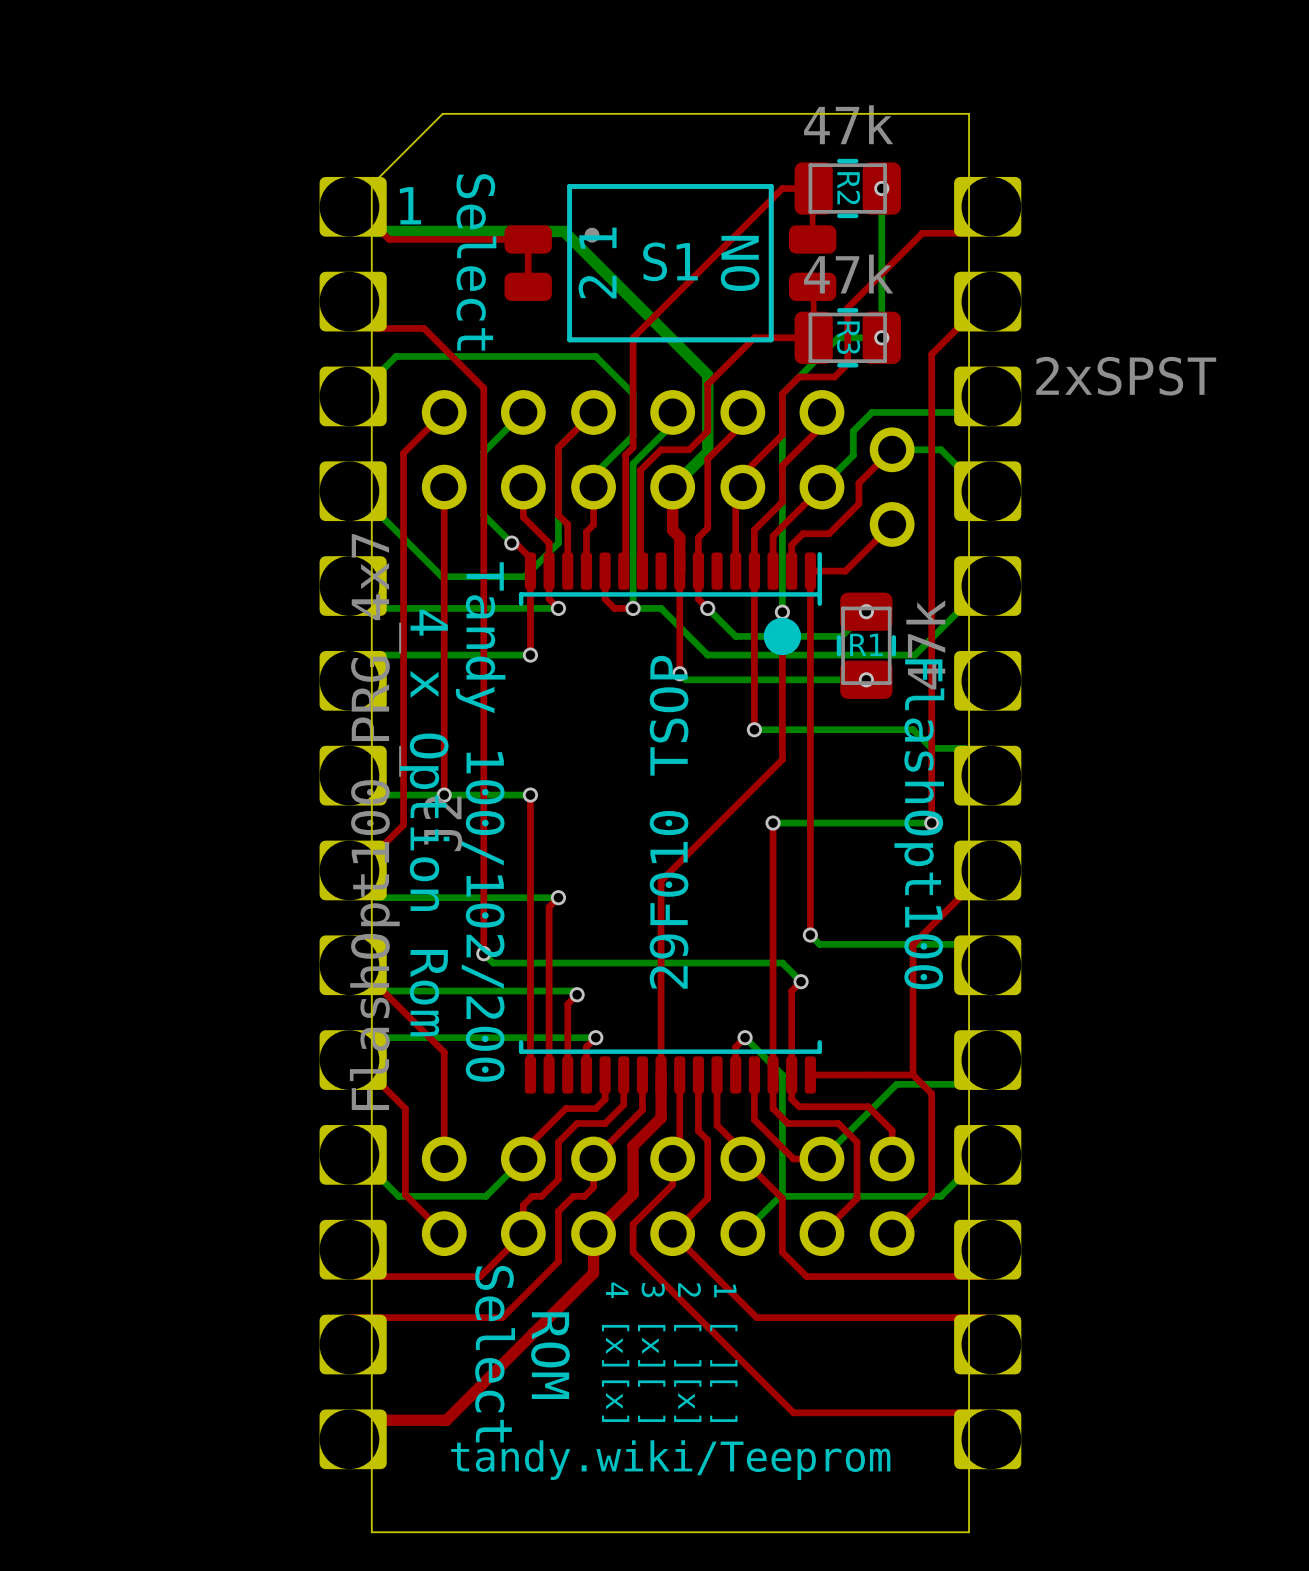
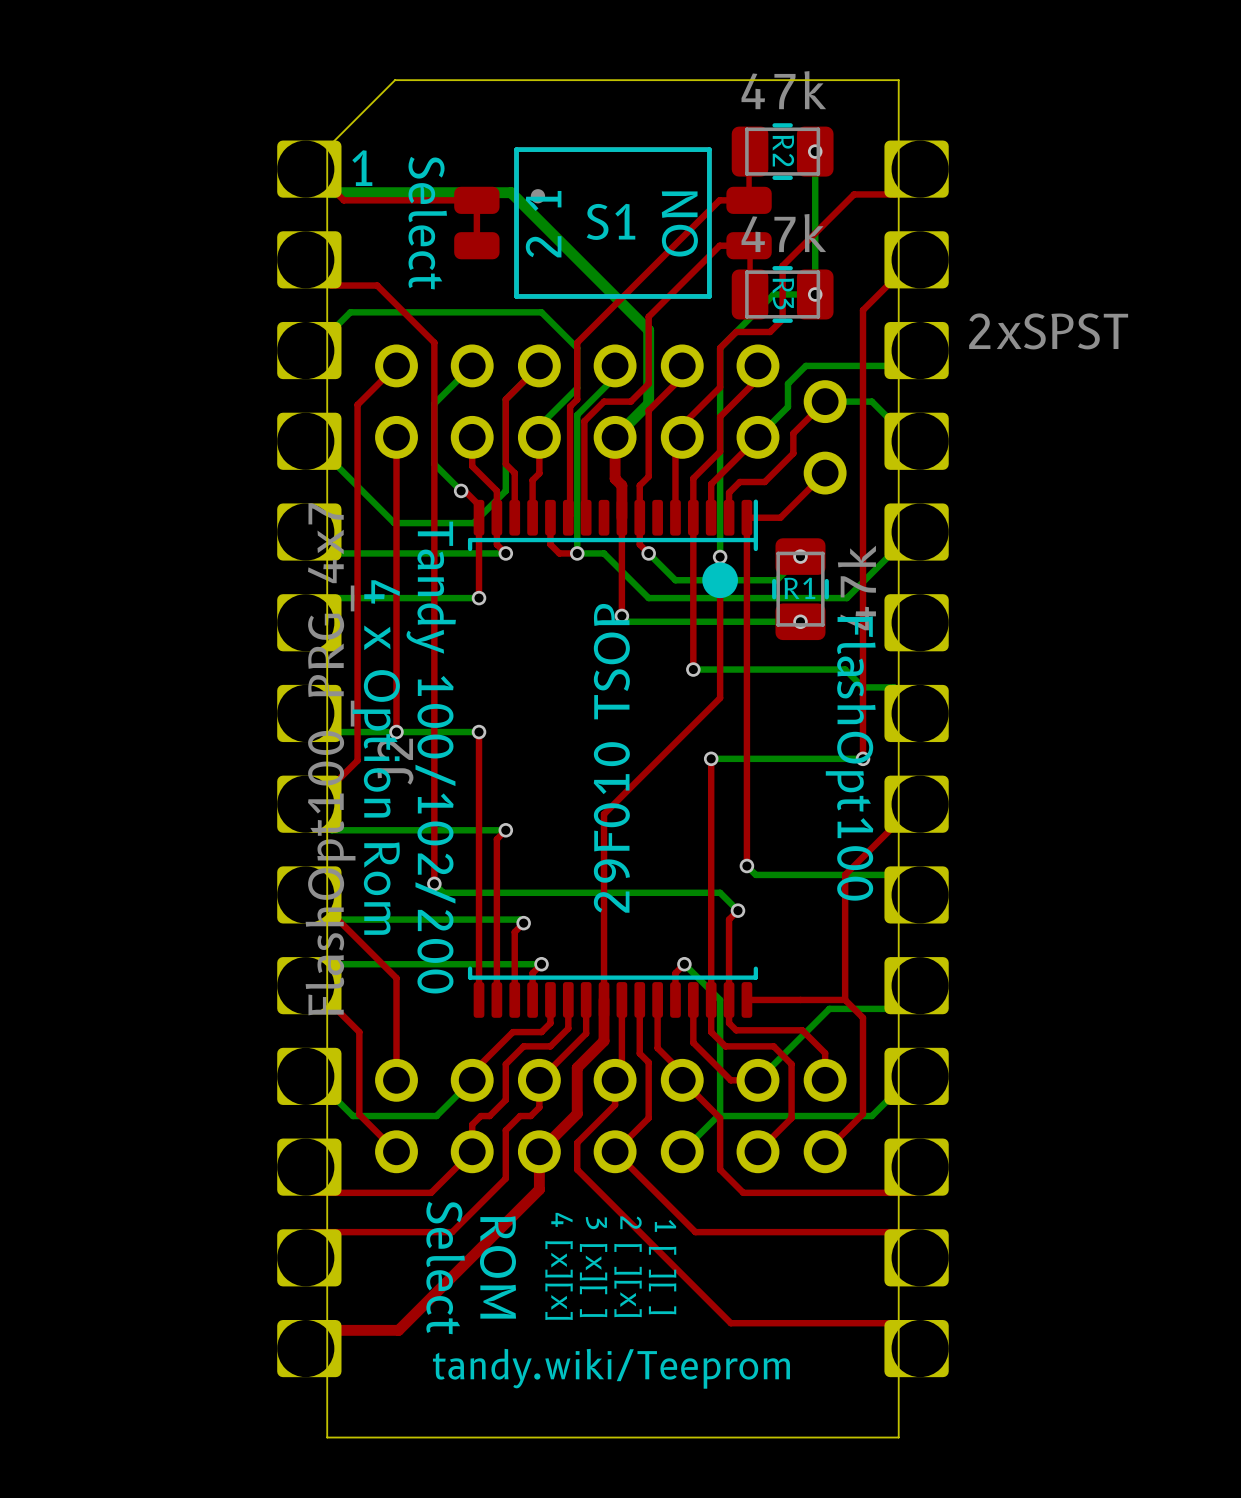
top track: (813, 188) (782, 188) (633, 337) (633, 388) -> (749, 200) (719, 200) (577, 342)
top track: (813, 337) (754, 337) (707, 384) -> (749, 245) (719, 245) (648, 316) (648, 339)

